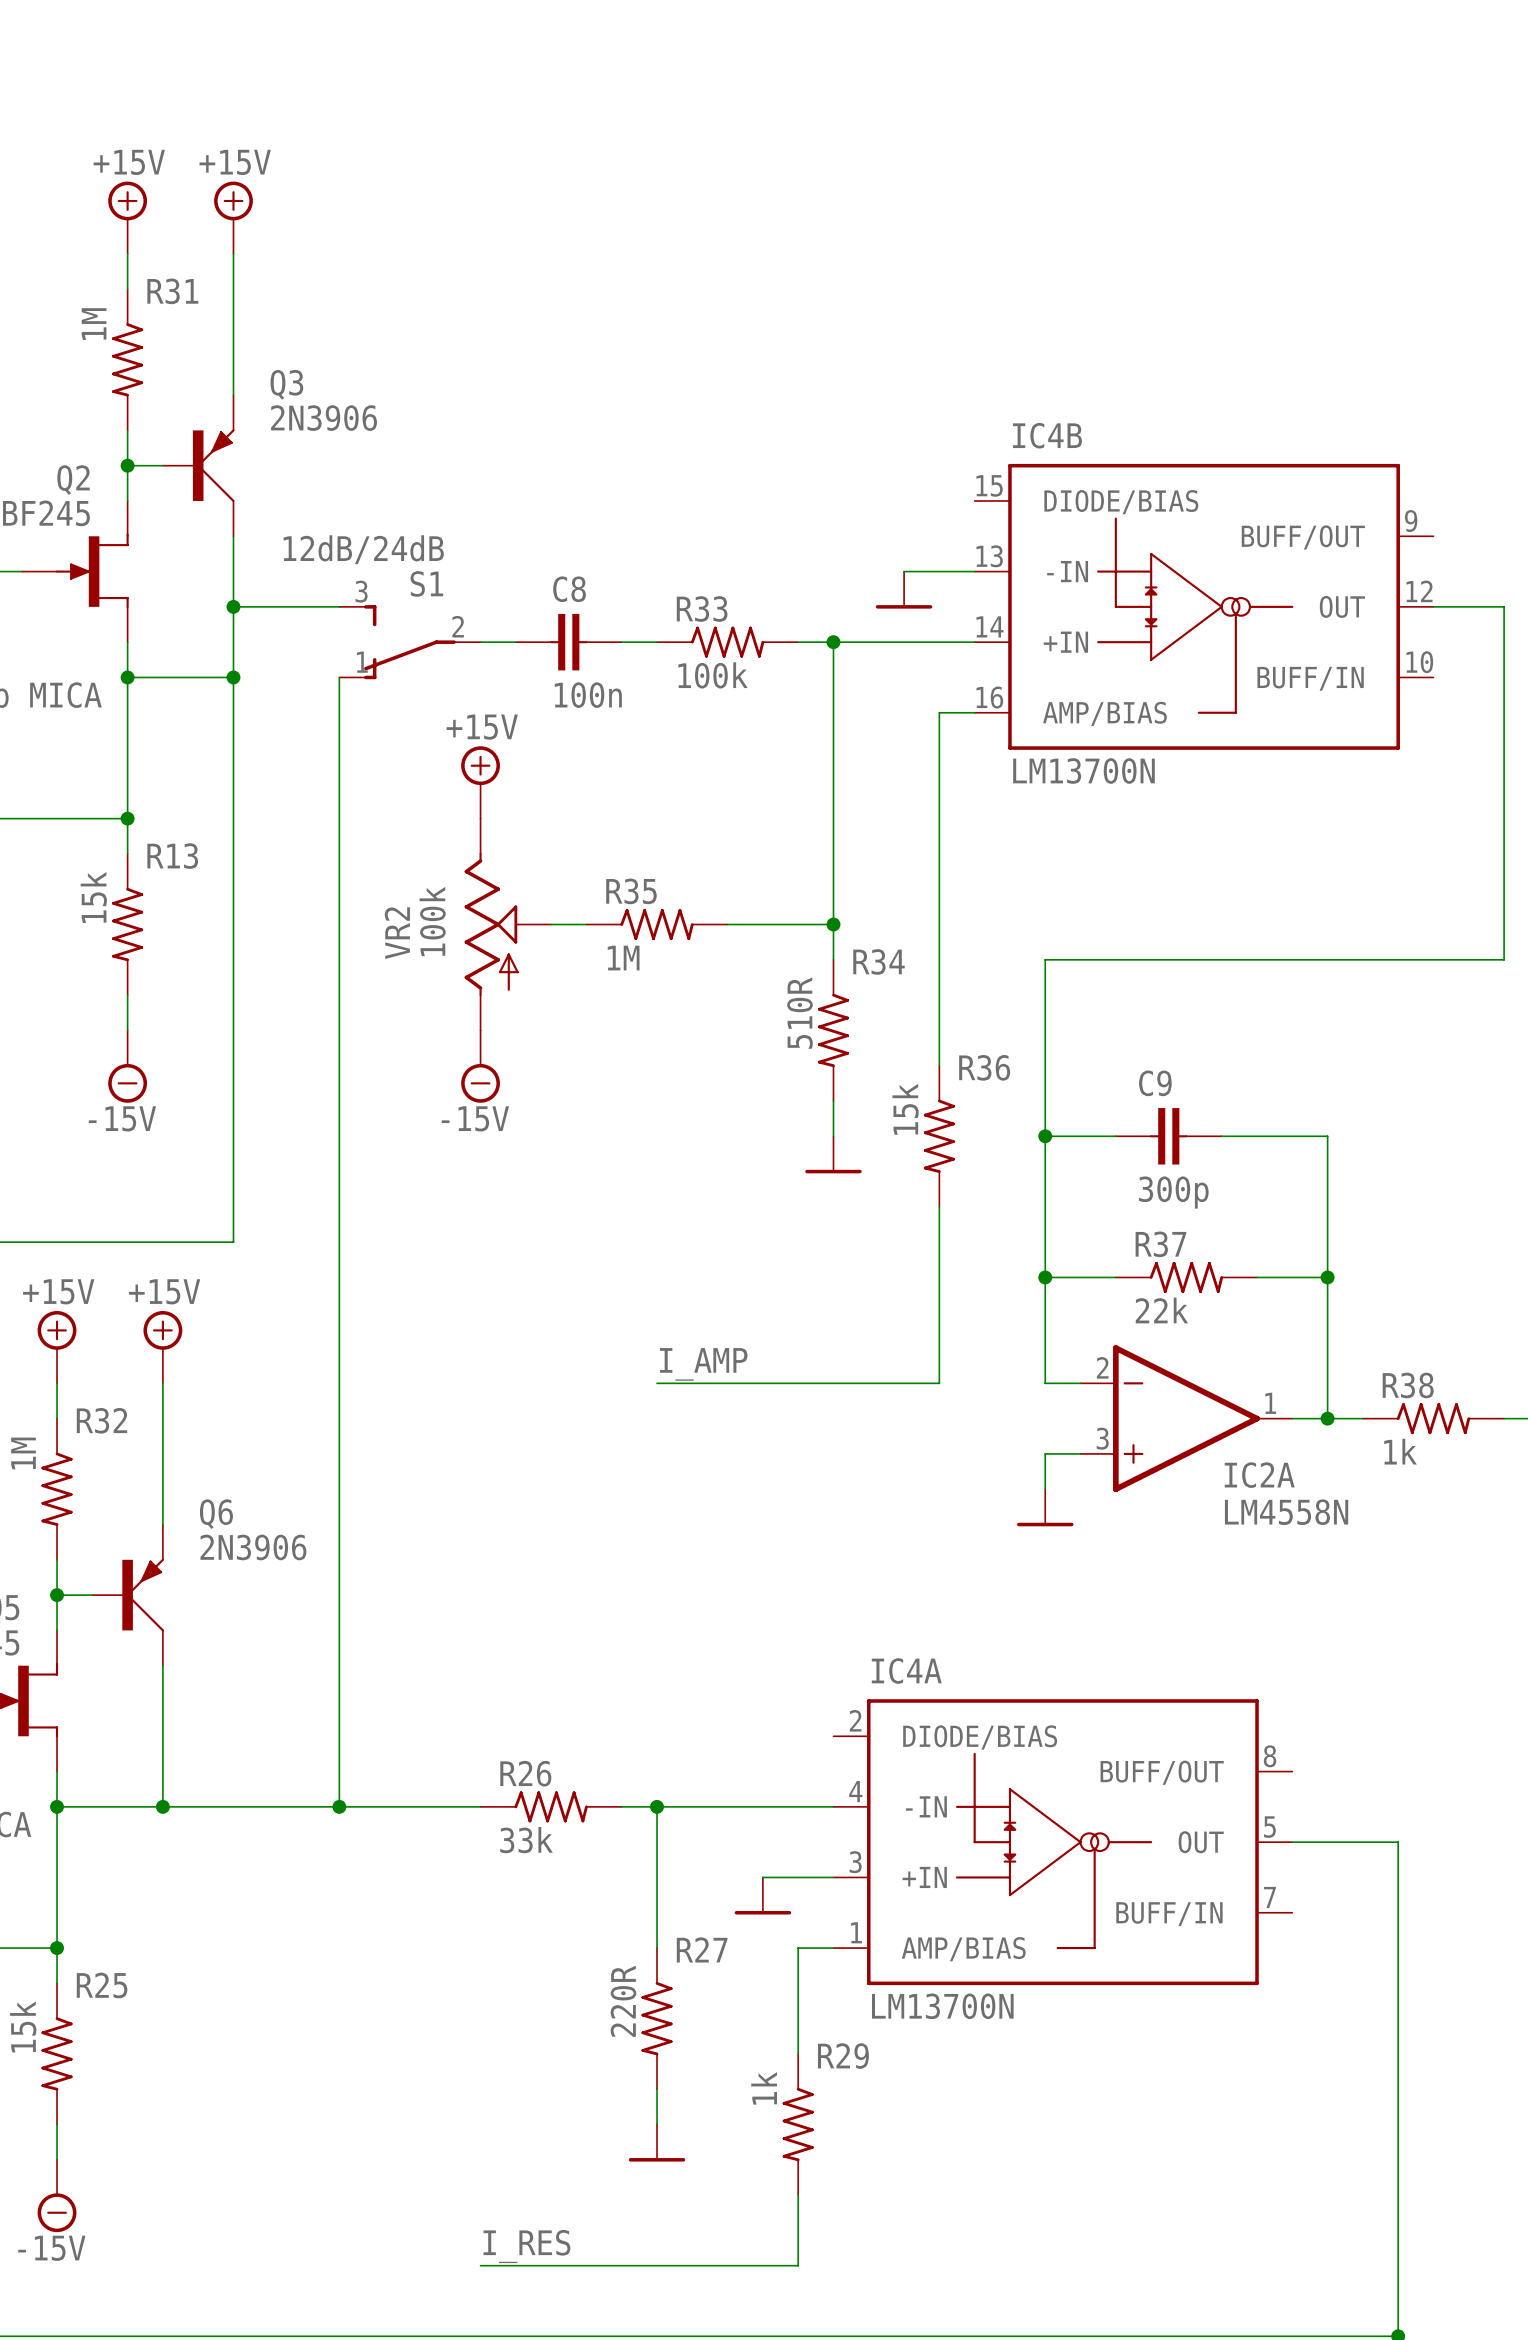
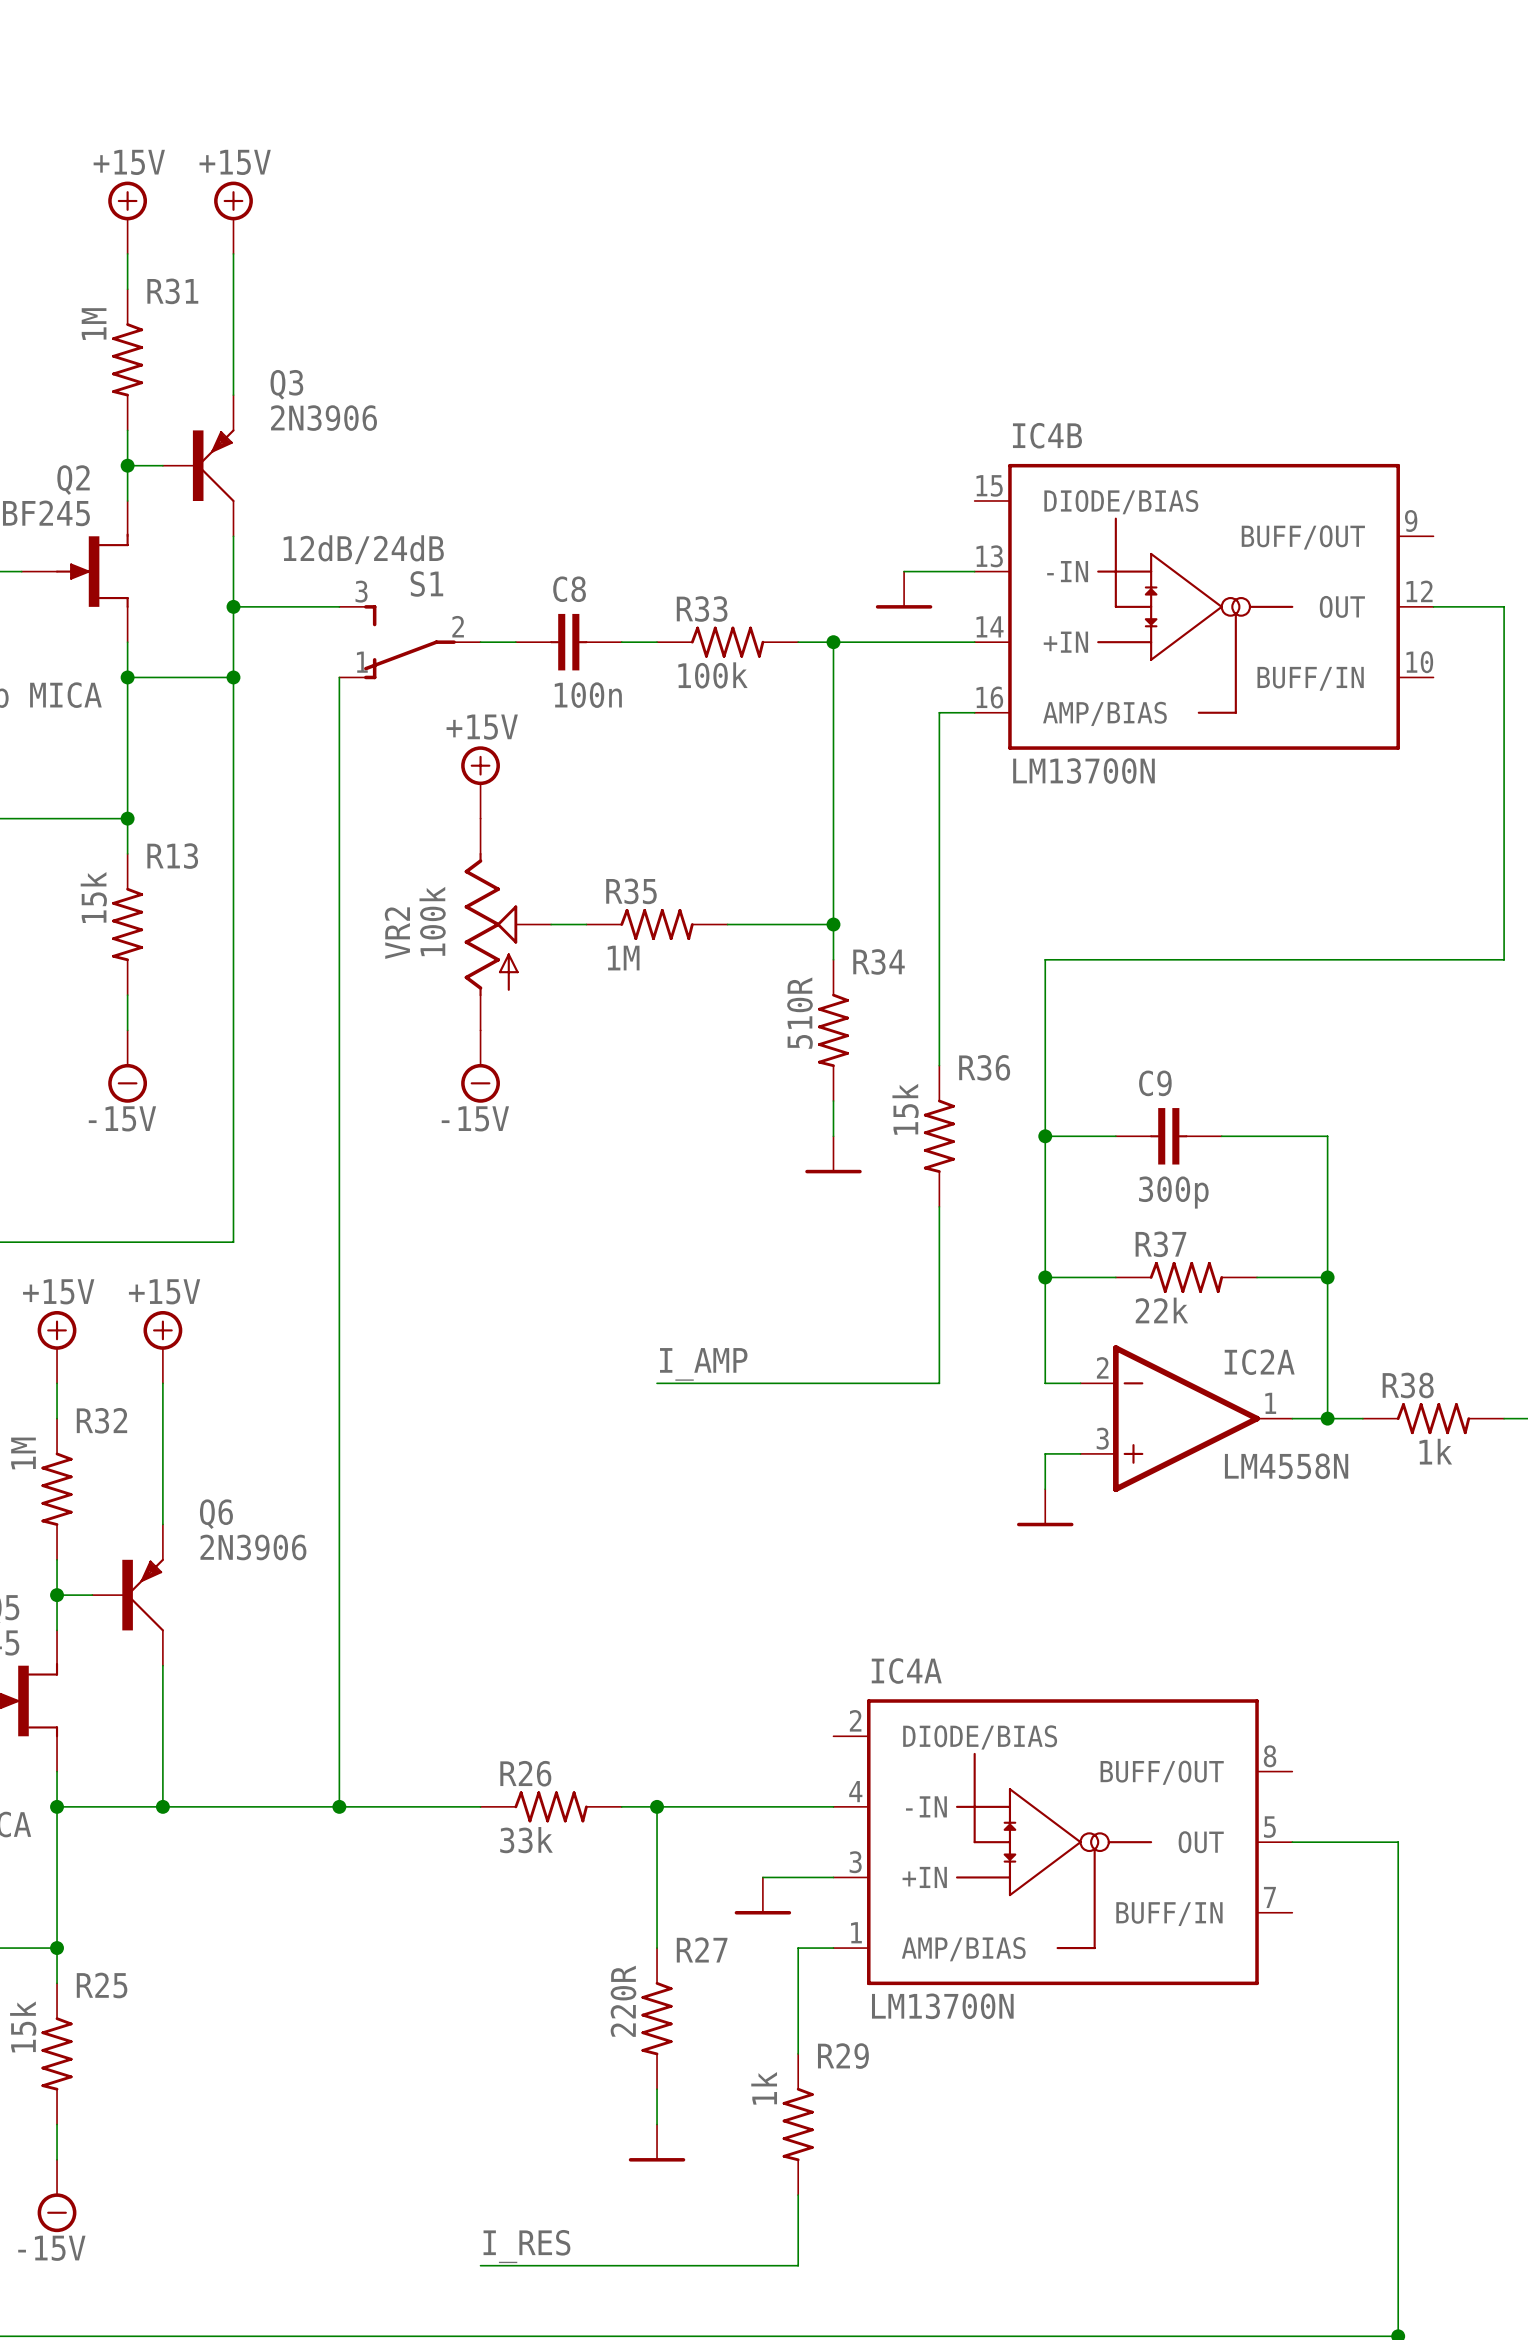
R38 value position: 1k (1400, 1451) -> 1k (1435, 1451)
IC2A name position: IC2A (1259, 1475) -> IC2A (1259, 1362)
IC2A value position: LM4558N (1286, 1512) -> LM4558N (1286, 1466)

